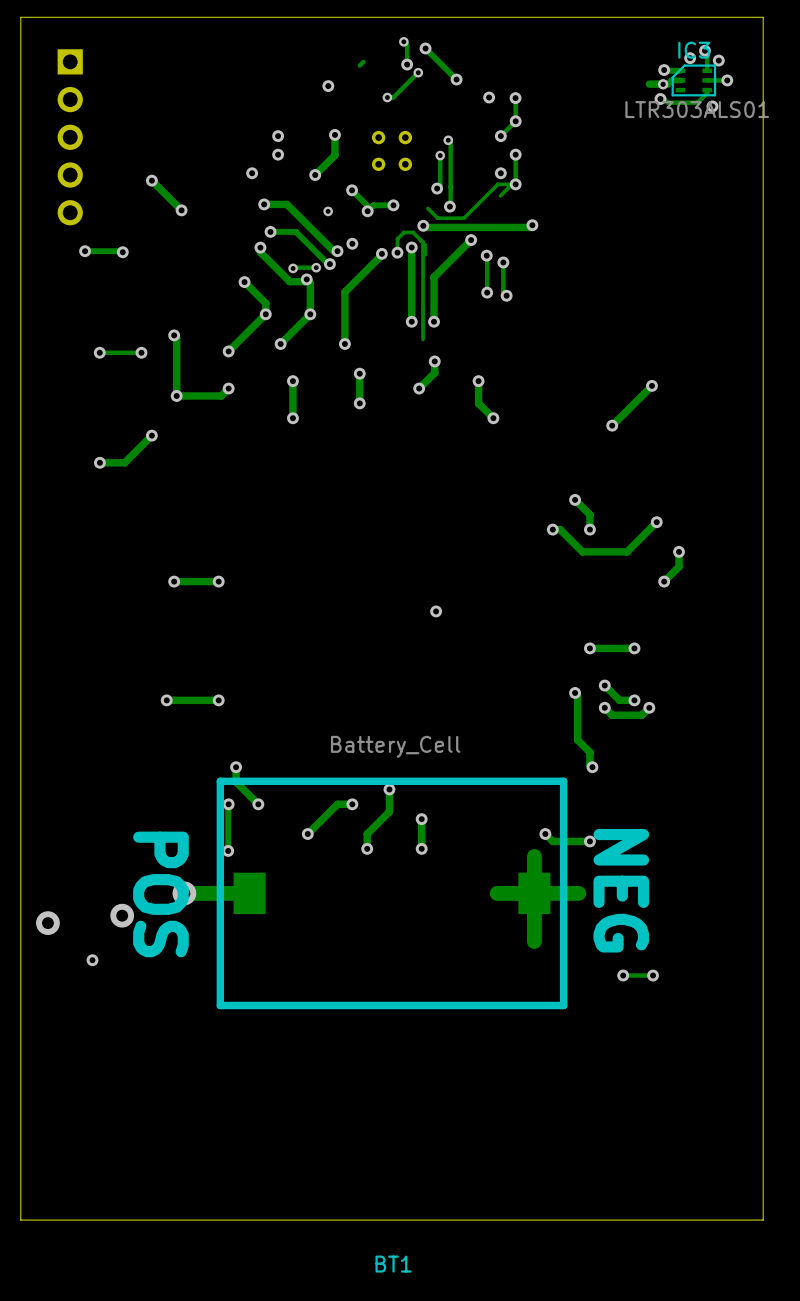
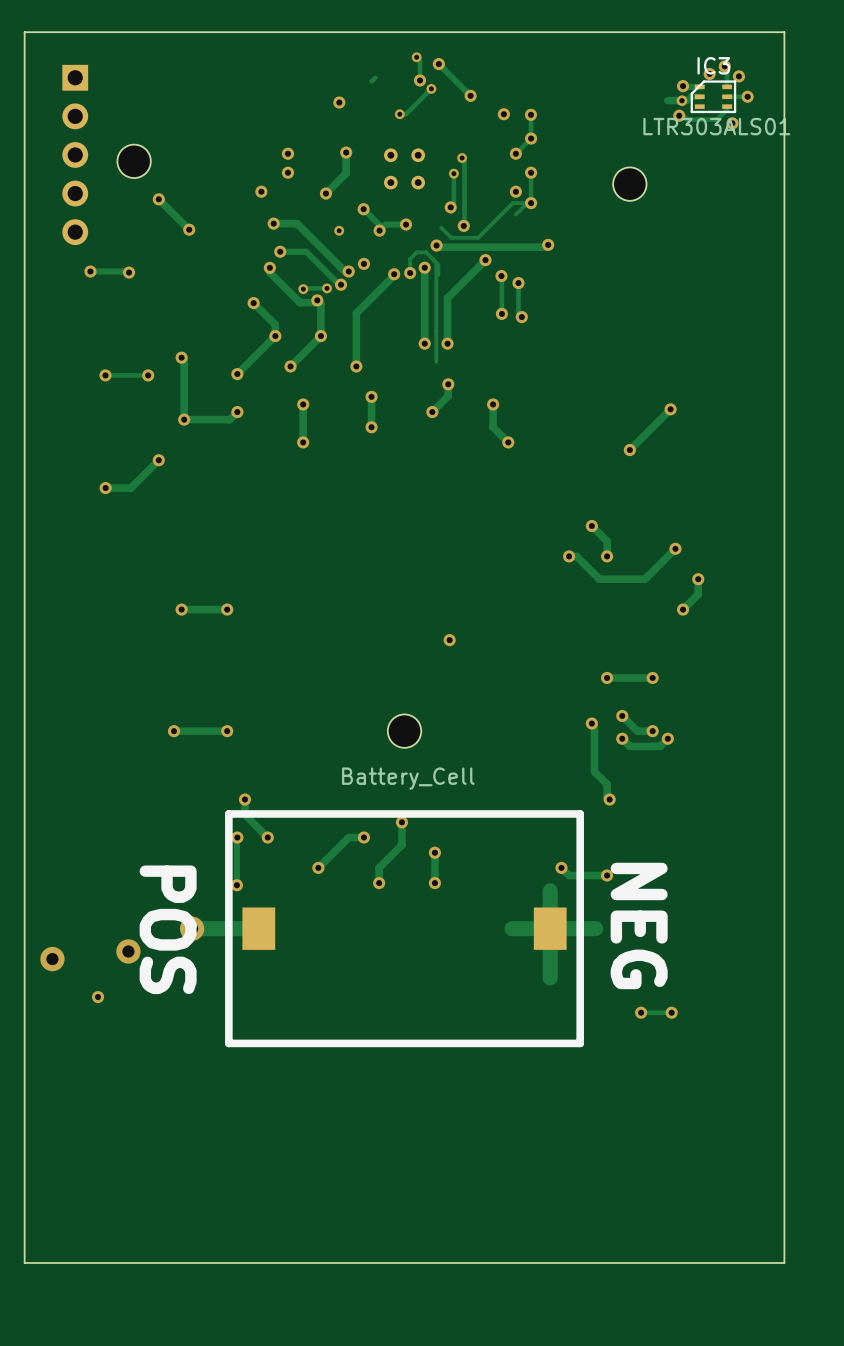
part: none -> (134, 161)
part: none -> (629, 184)
part: none -> (404, 731)
BT1 name: BT1 (393, 1264) -> none

